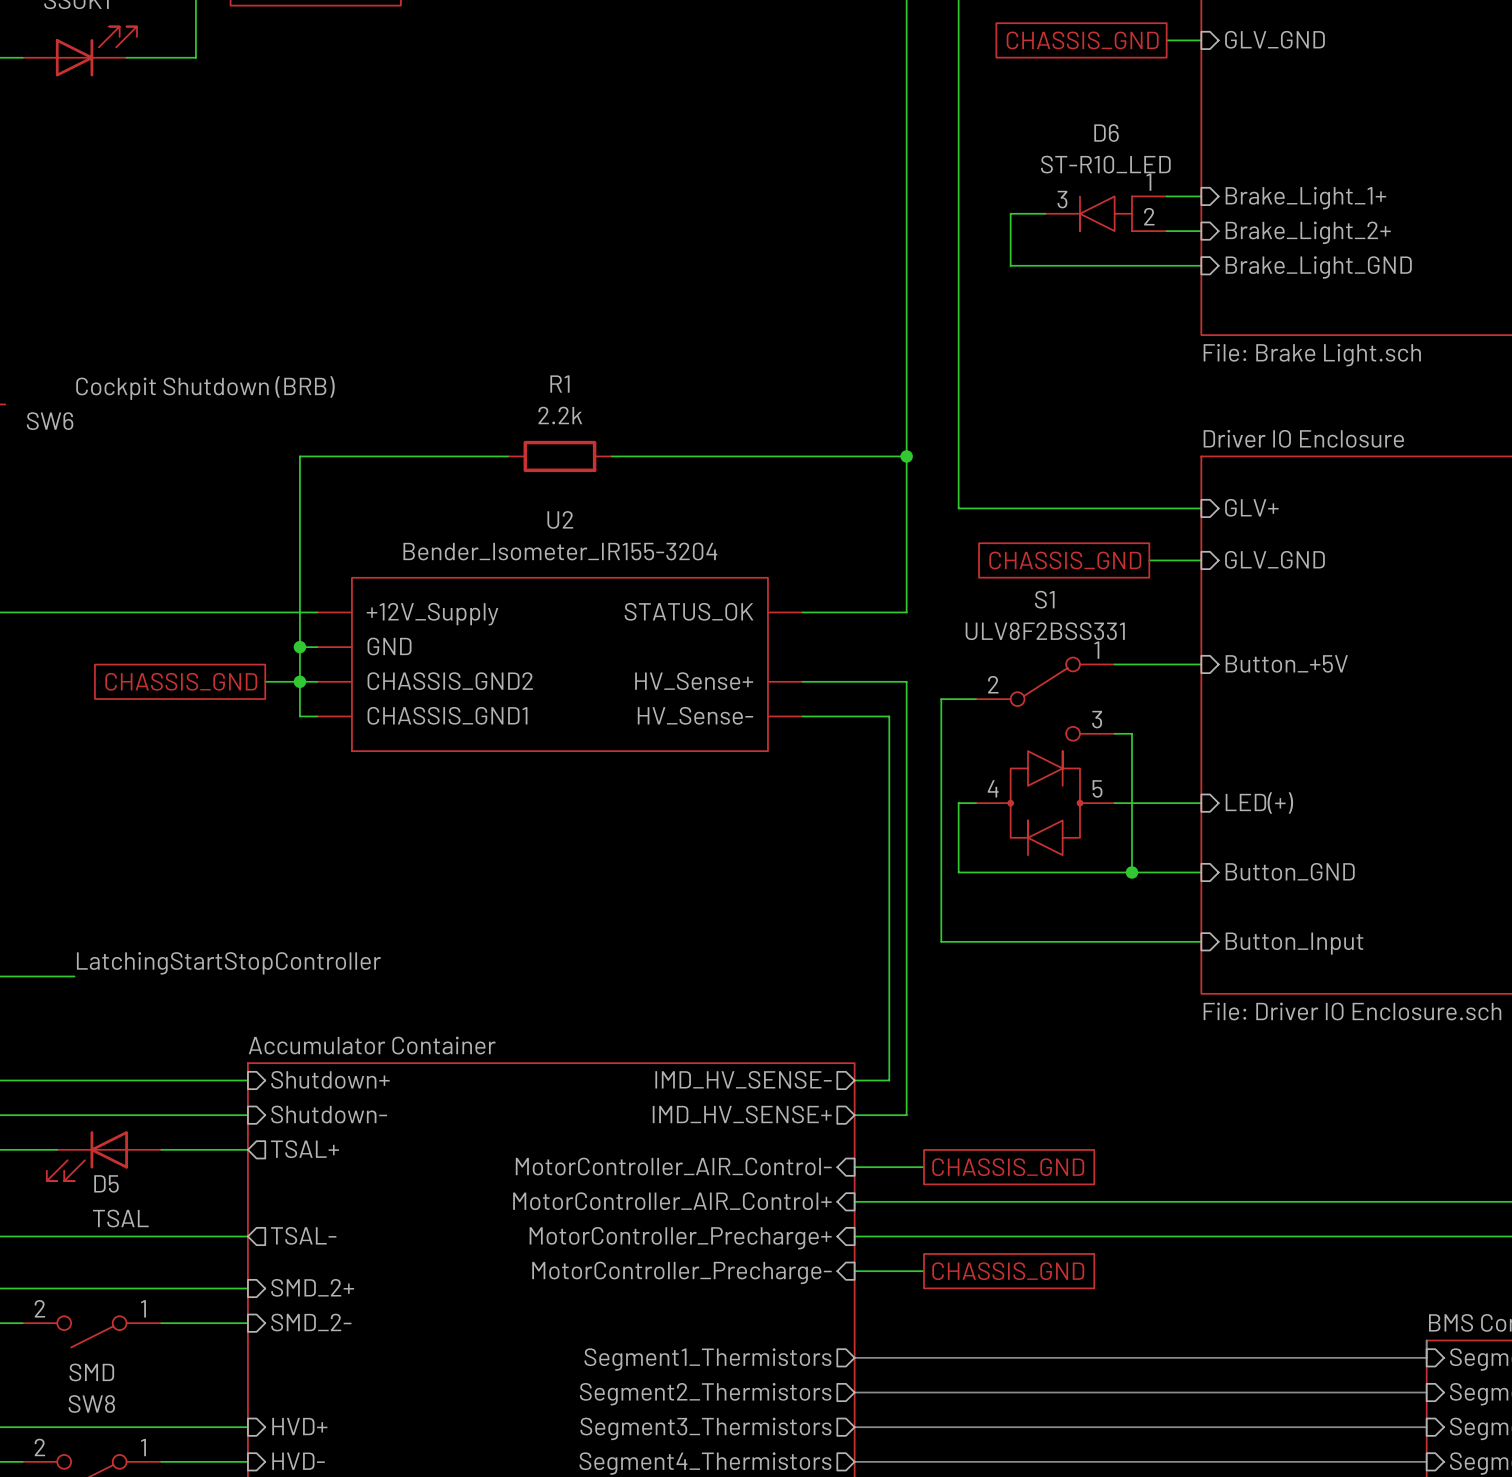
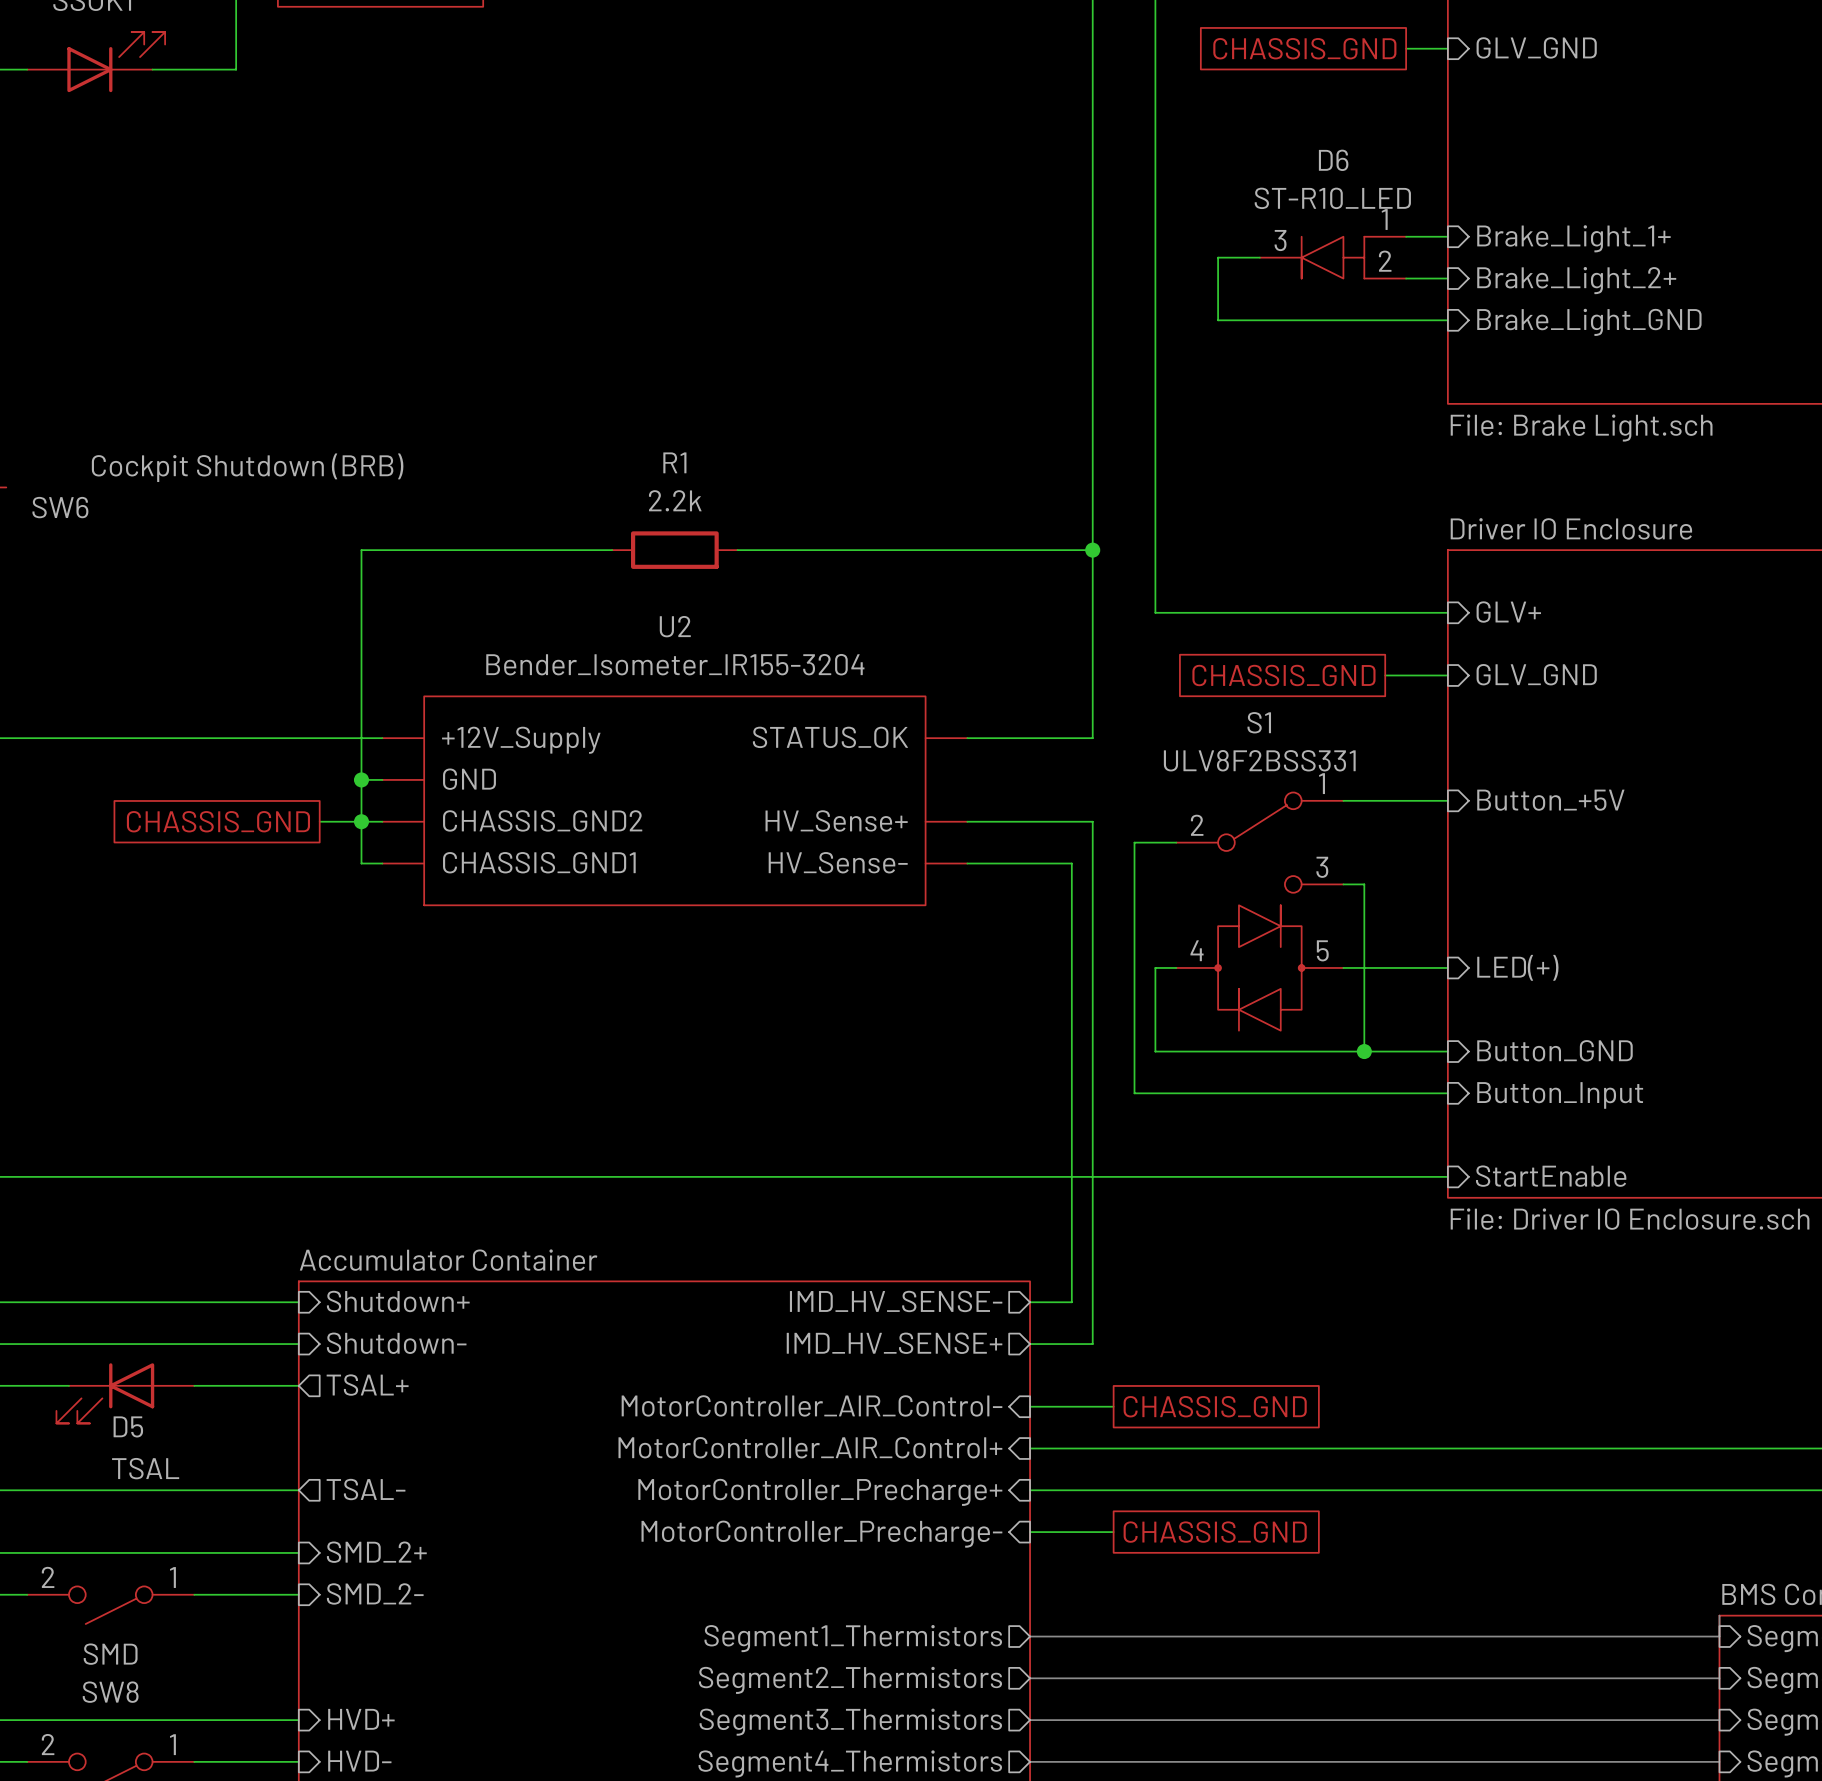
wire: (941, 907) (941, 941) (1201, 941) -> (1134, 1093) (1447, 1093)
sheet pin position: Button_Input (1294, 943) -> Button_Input (1560, 1095)
label: LatchingStartStopController (228, 963) -> none
sheet pin: none -> StartEnable (1551, 1176)
wire: none -> (89, 1176) (1447, 1176)

